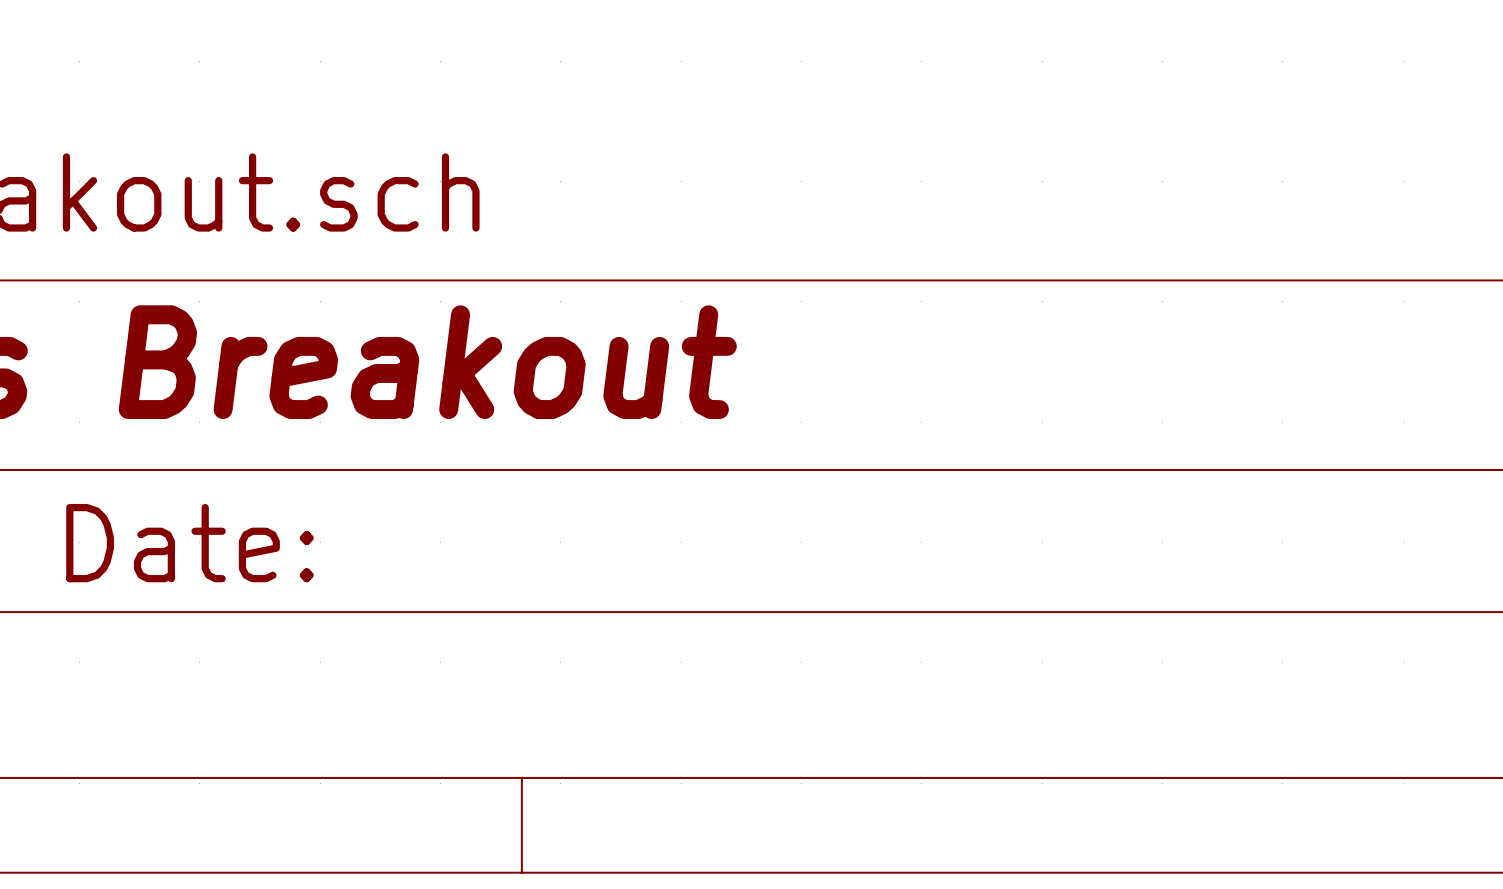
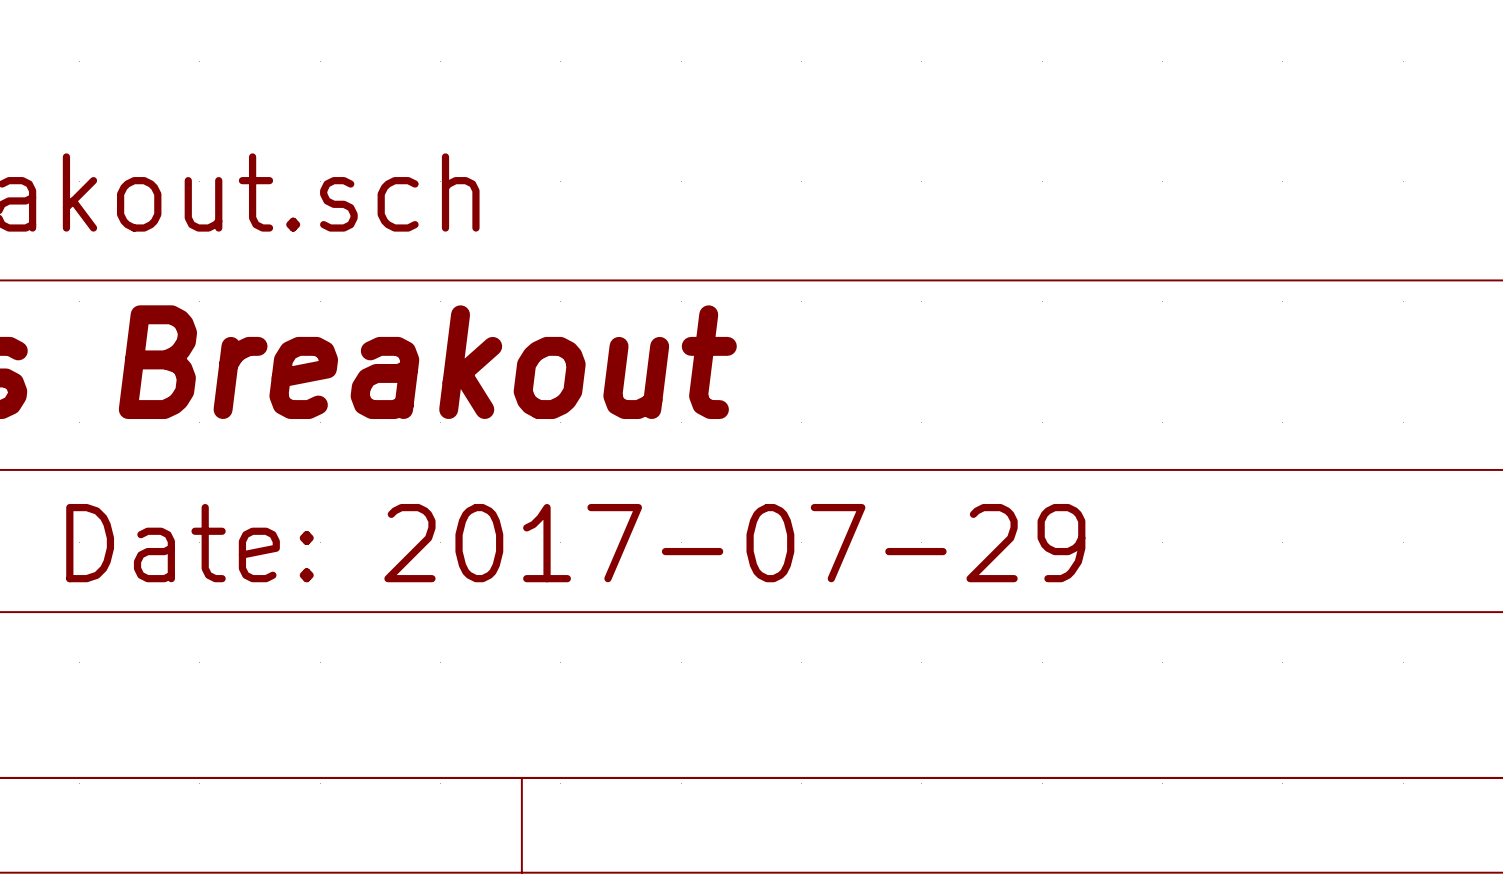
title block: Date: (189, 543) -> Date: 2017-07-29 (575, 543)

